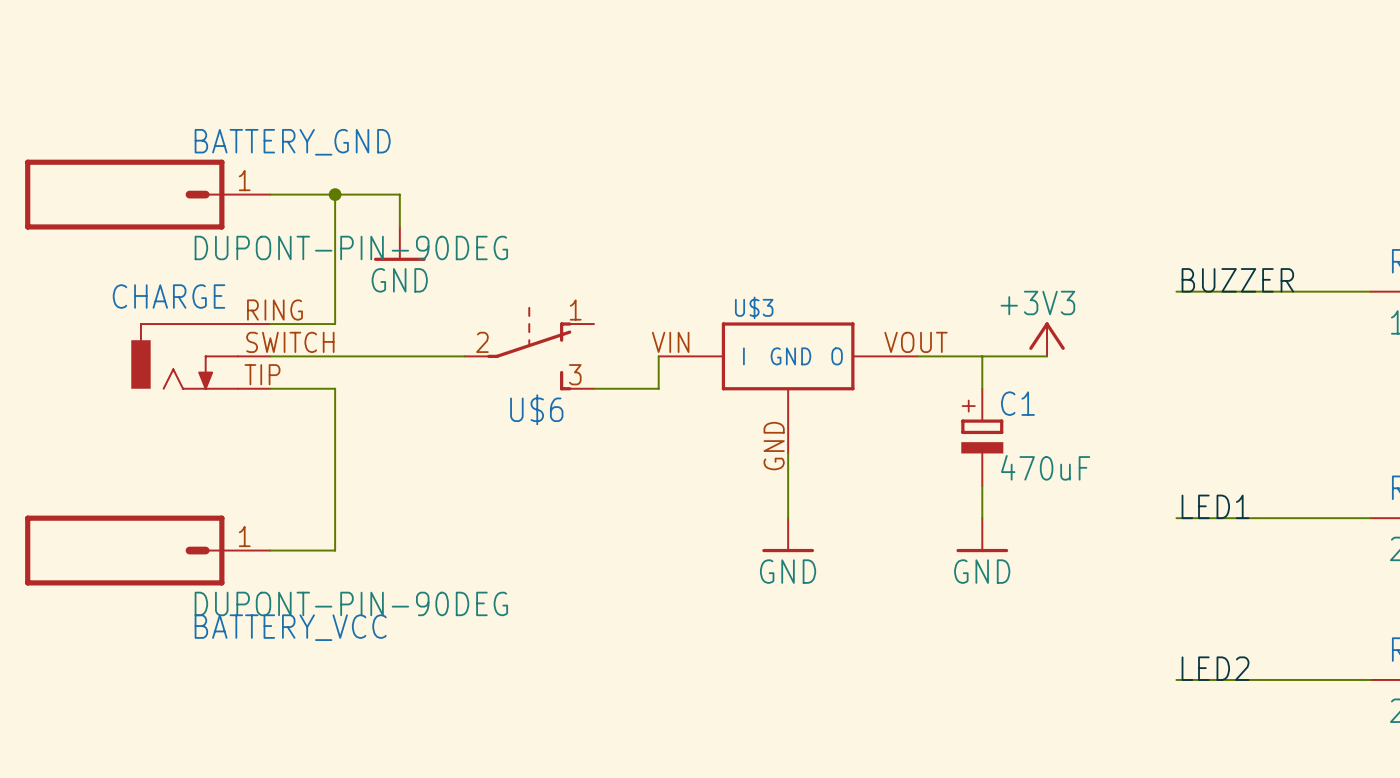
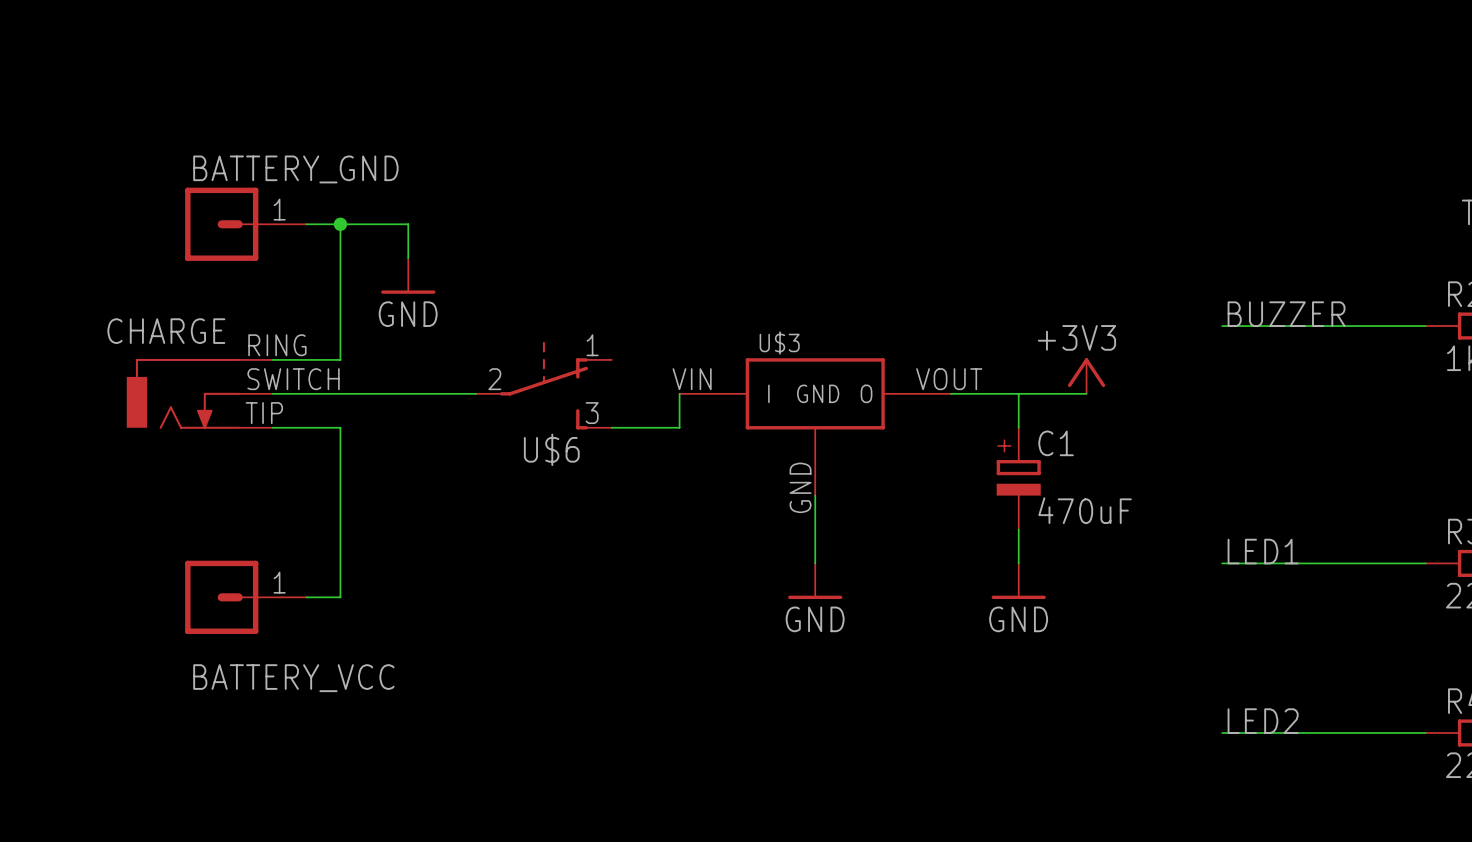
BATTERY_GND: DUPONT-PIN-90DEG (147, 194) -> none
BATTERY_GND: none -> (245, 224)
BATTERY_VCC: DUPONT-PIN-90DEG (147, 550) -> none
BATTERY_VCC: none -> (245, 597)

